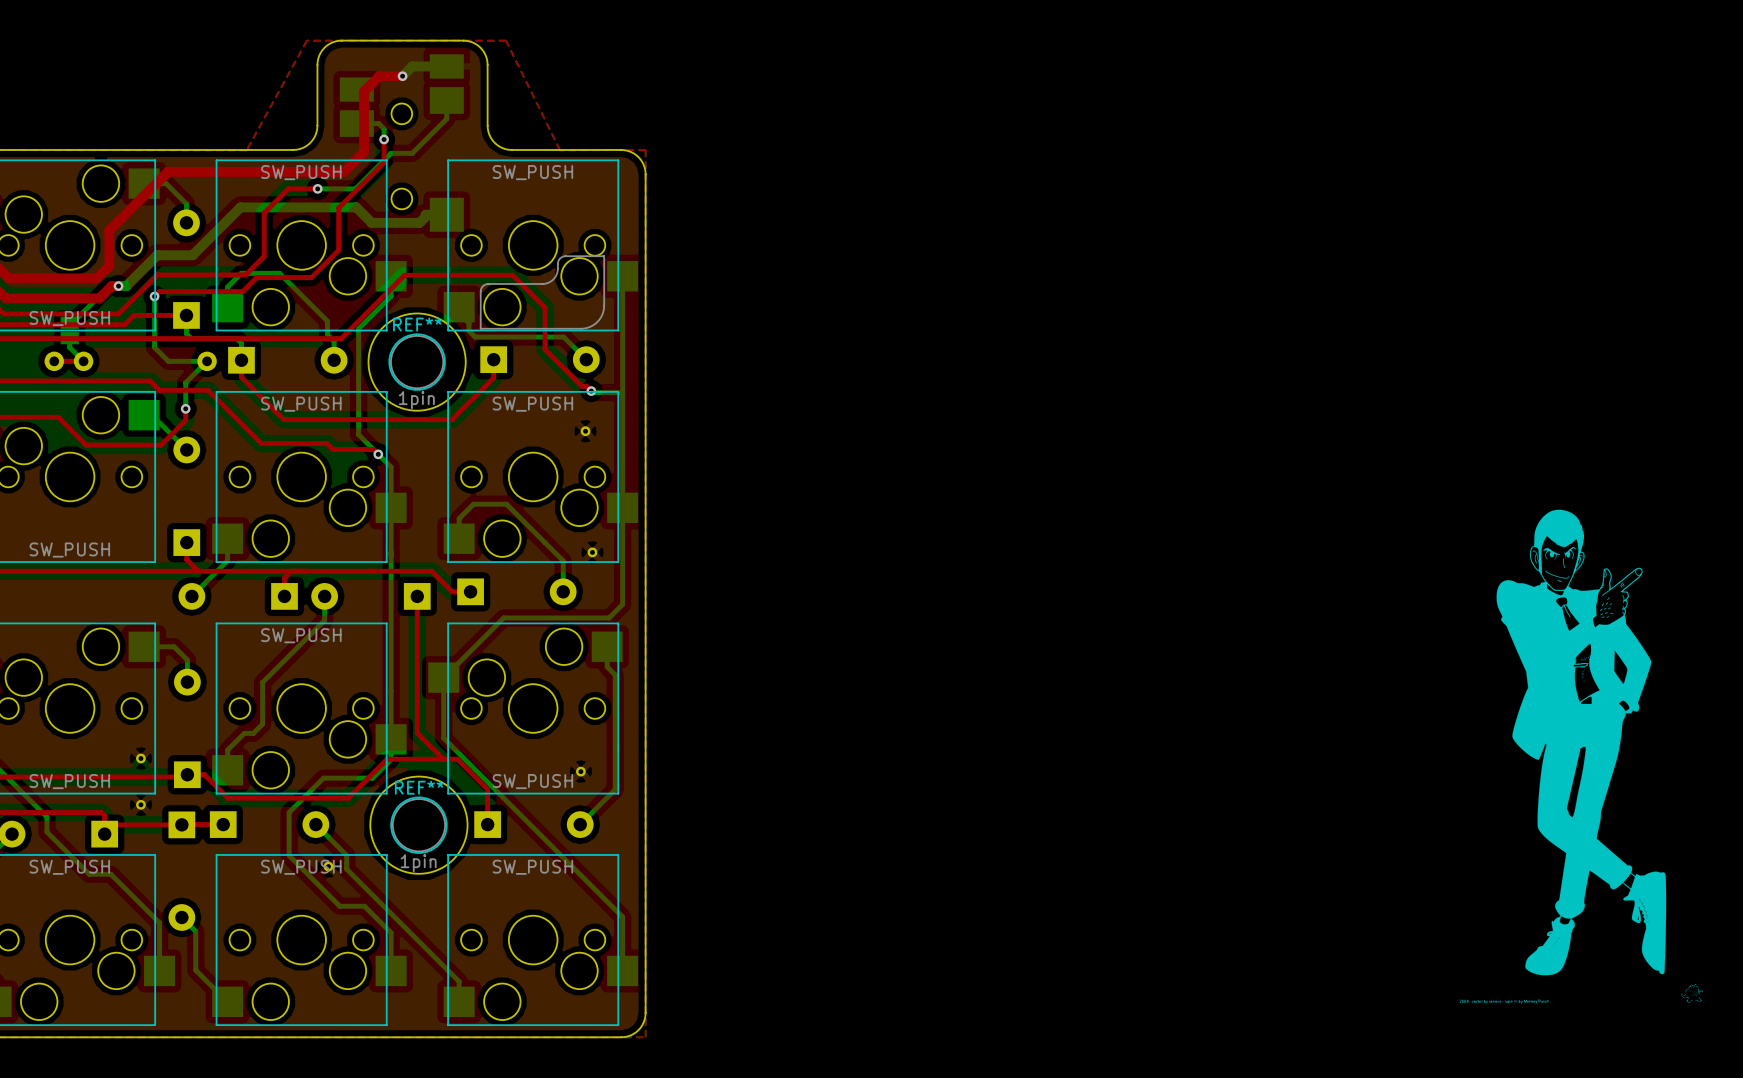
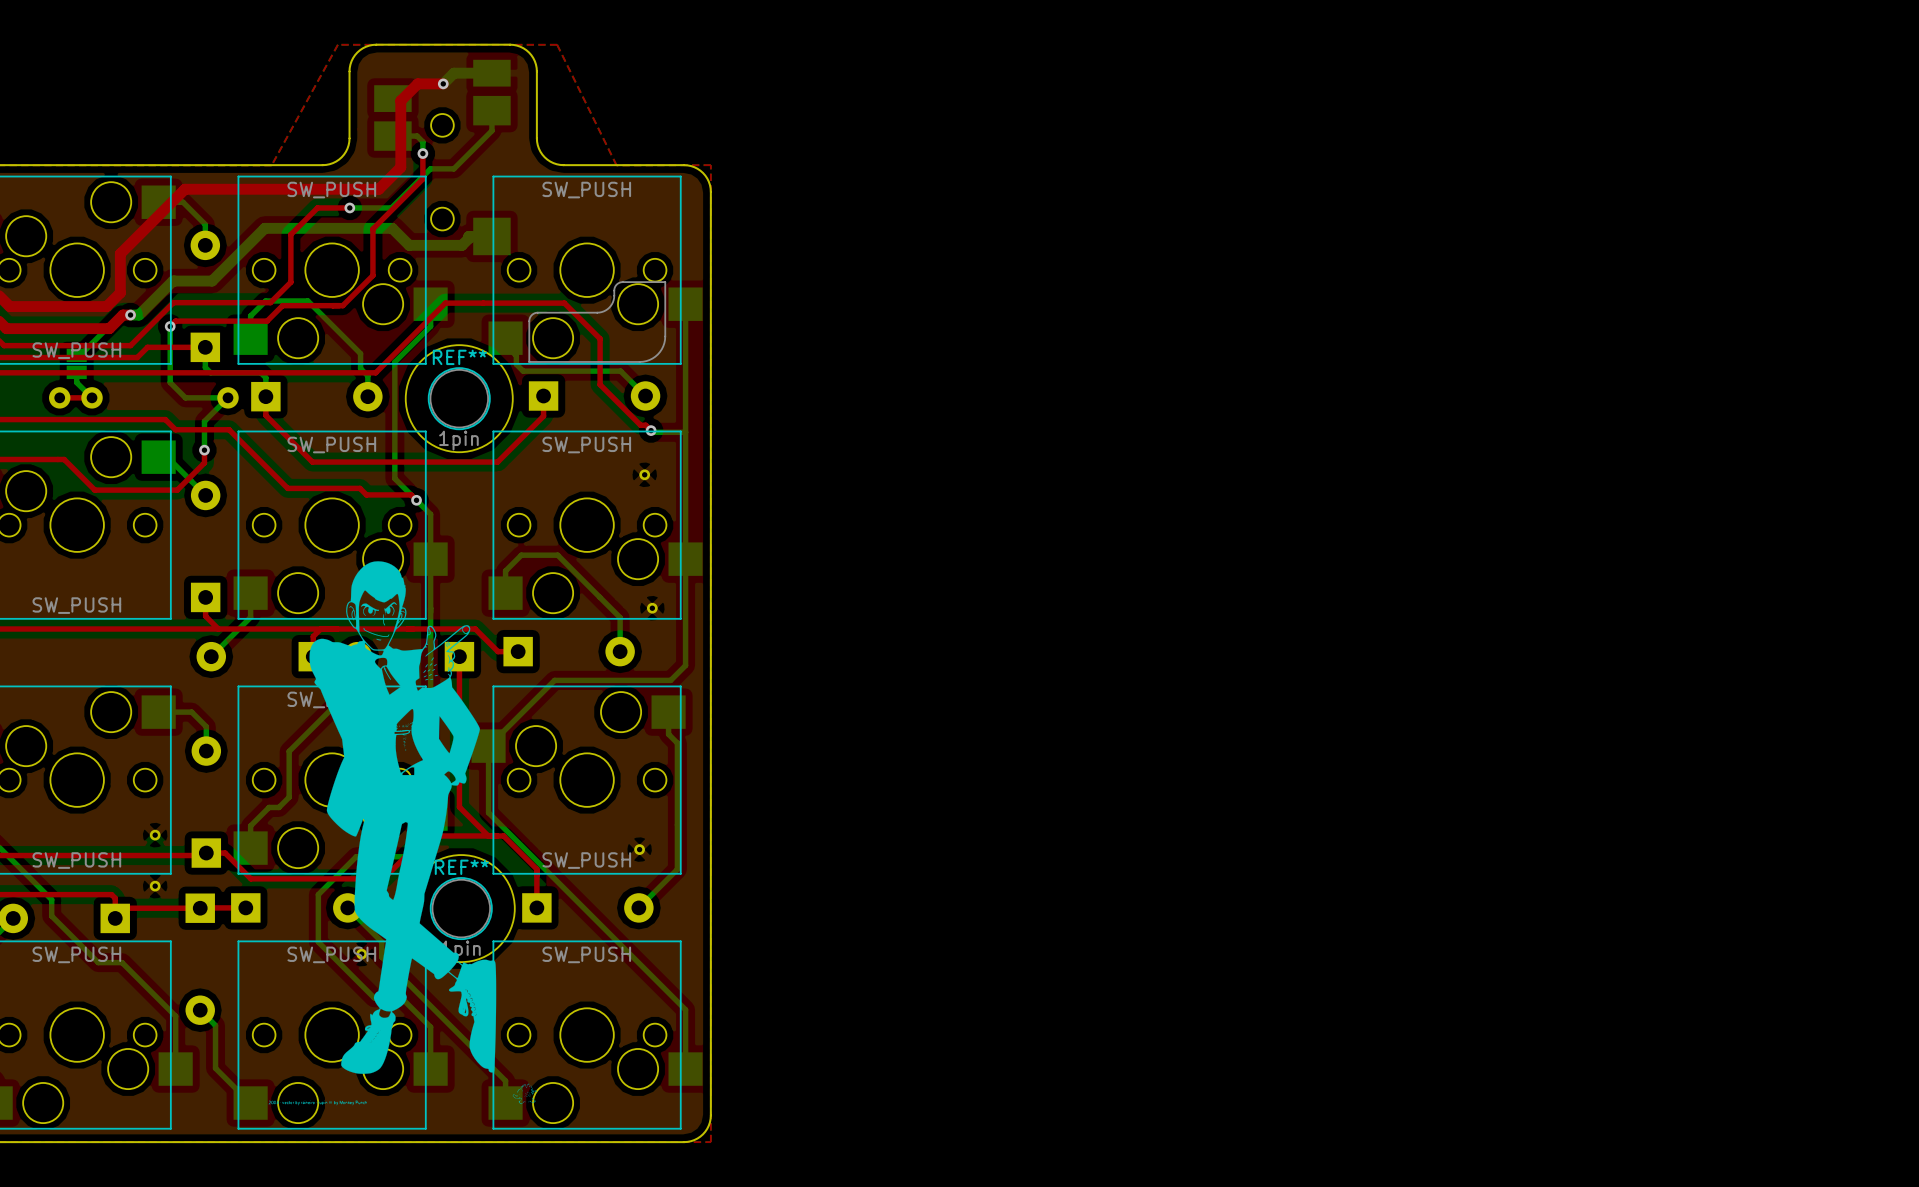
drawing: none -> [268, 561, 537, 1106]
drawing: [1459, 509, 1703, 1004] -> none

